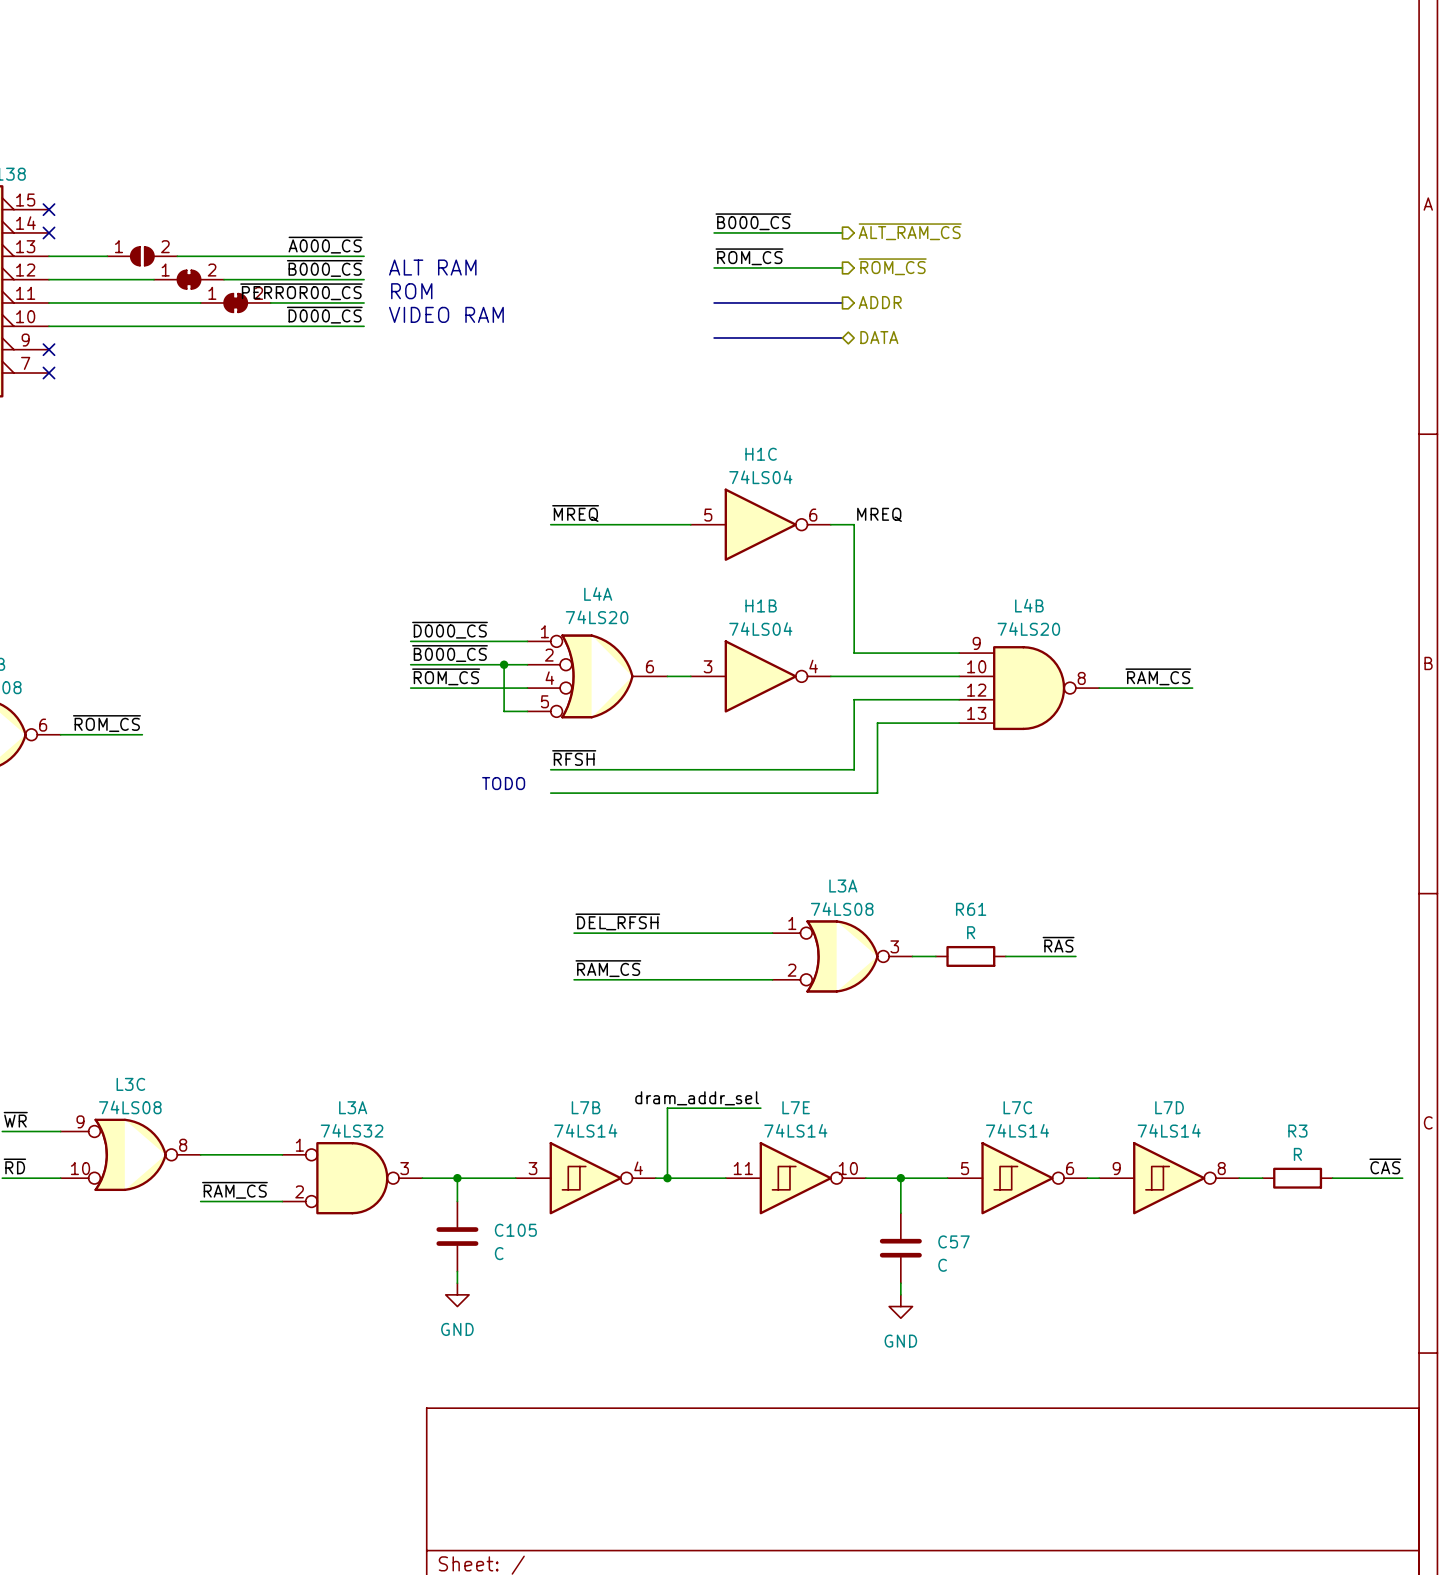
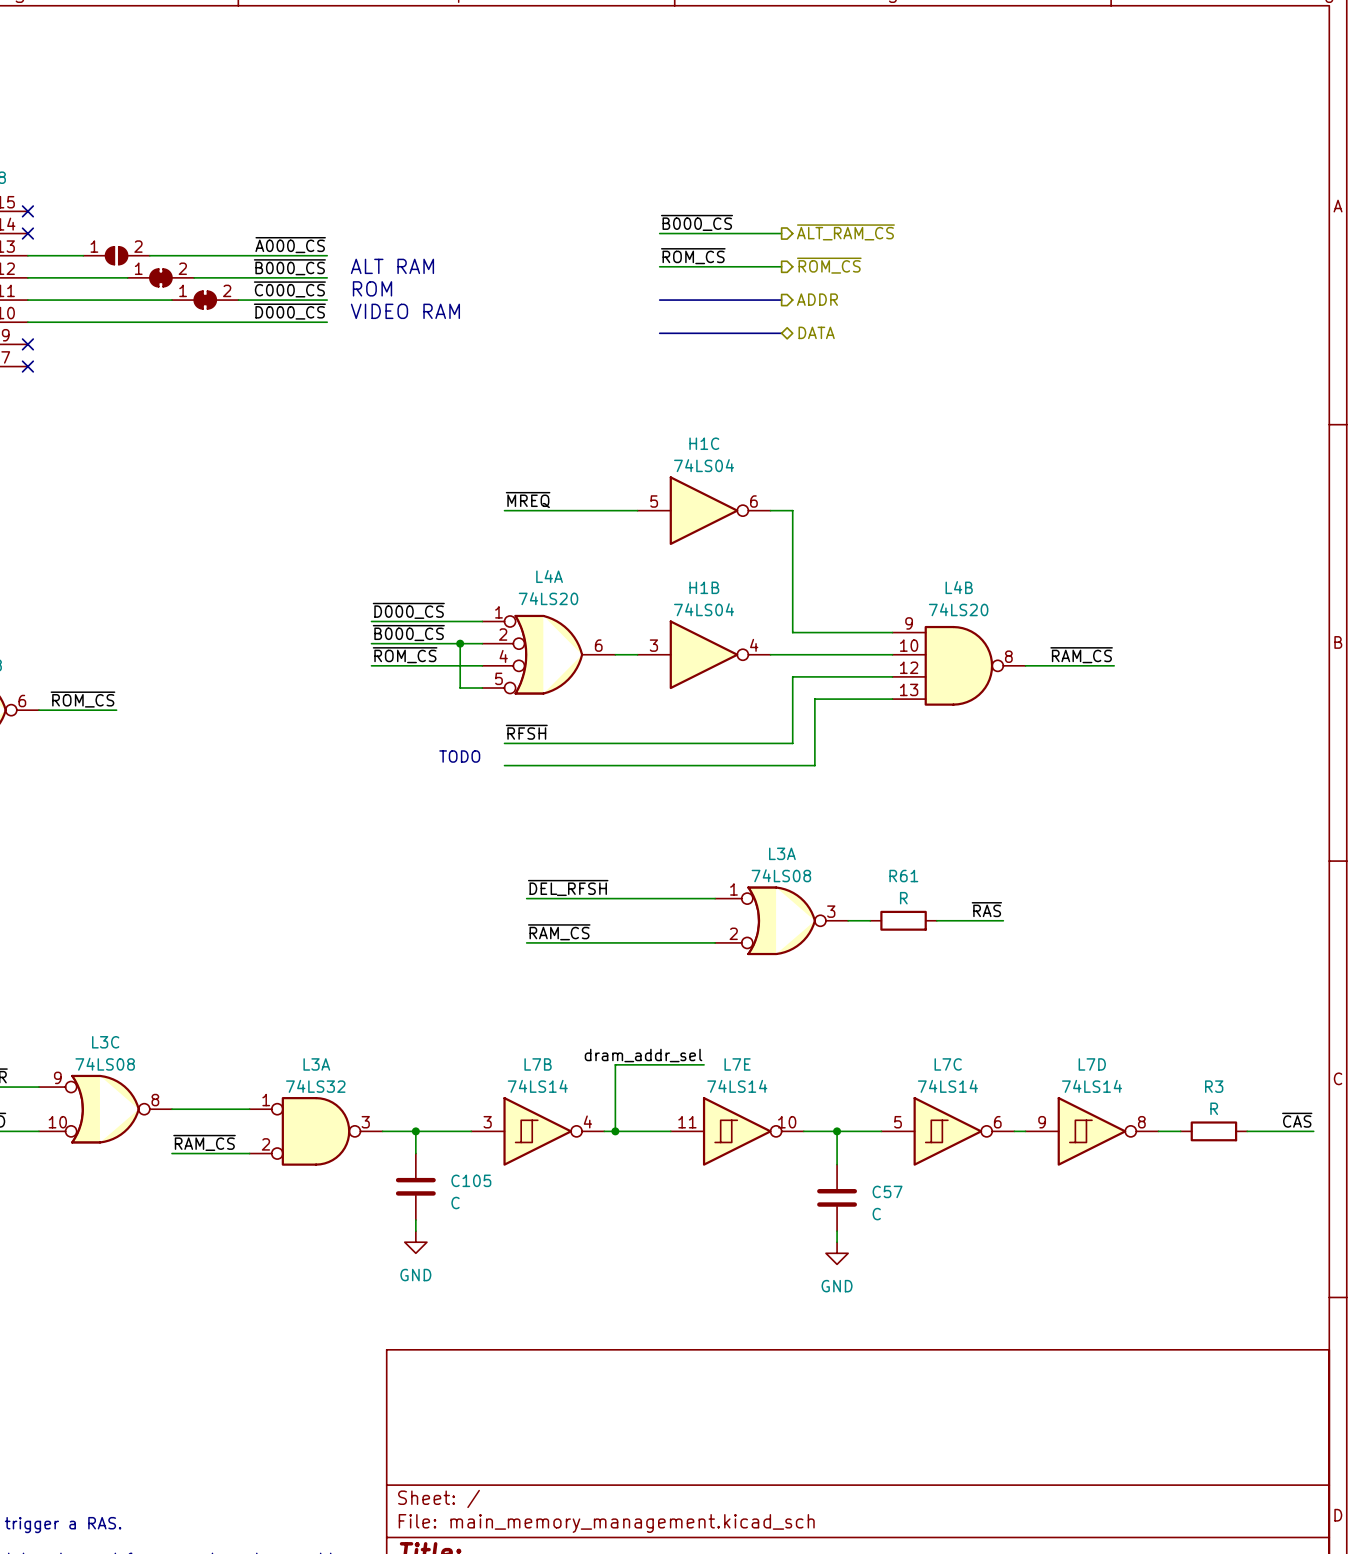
label: ~{PERROR00_CS} (301, 291) -> ~{C000_CS} (289, 289)
label: MREQ (879, 514) -> none

